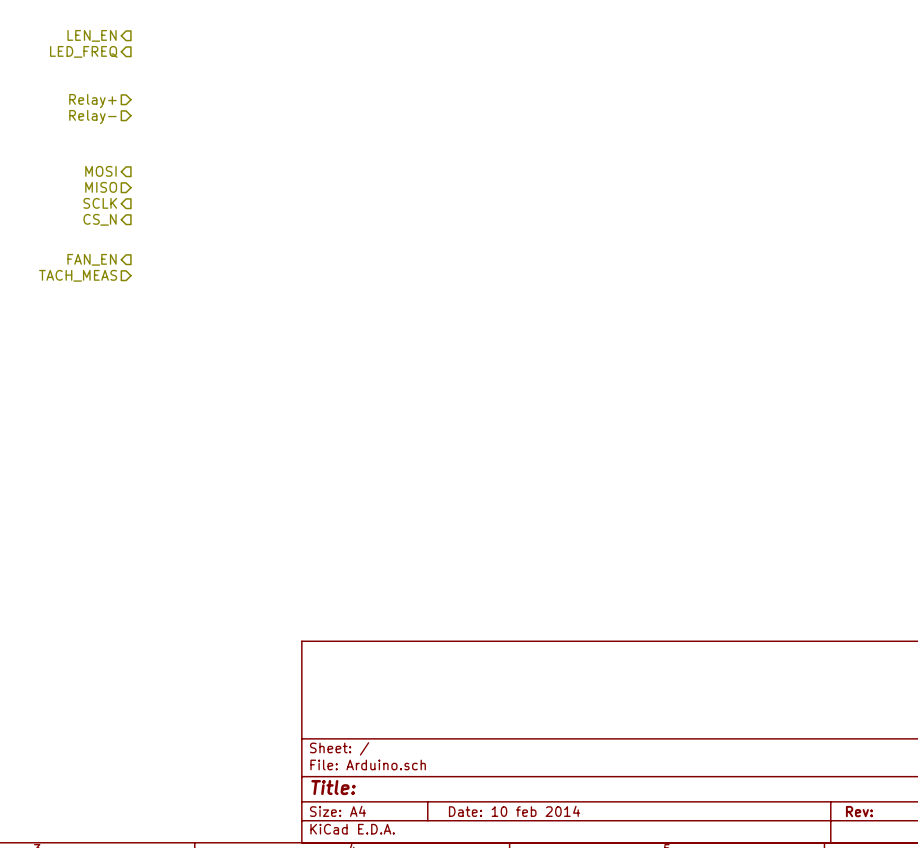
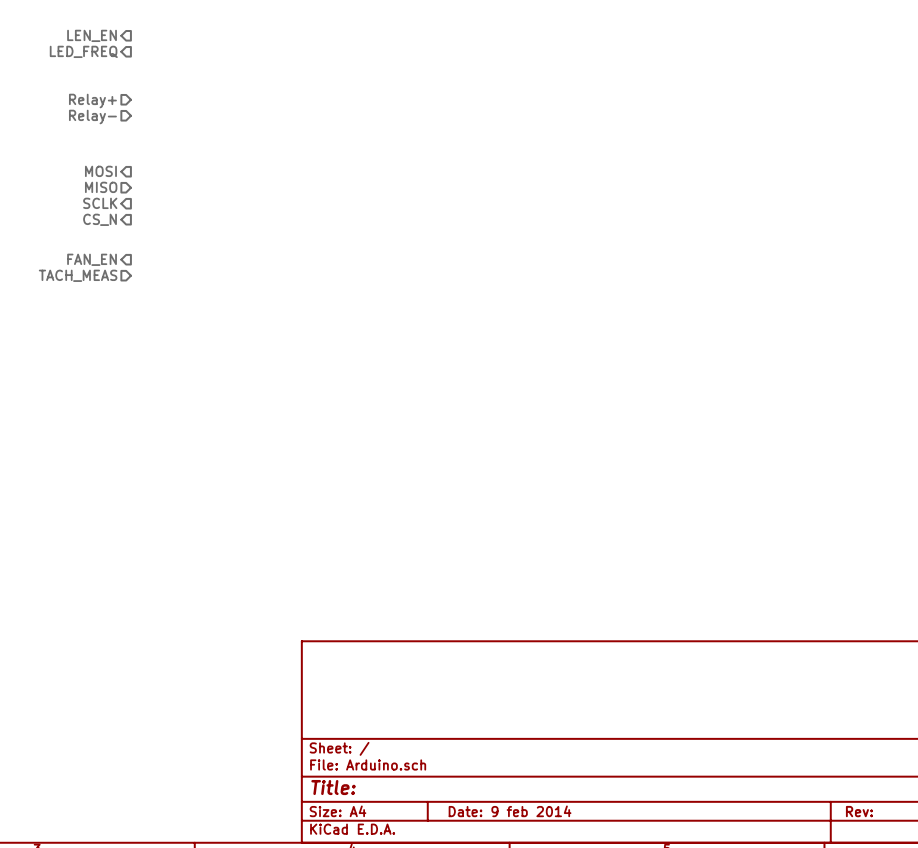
title block: Date: 10 feb 2014 (514, 811) -> Date: 9 feb 2014 (510, 811)

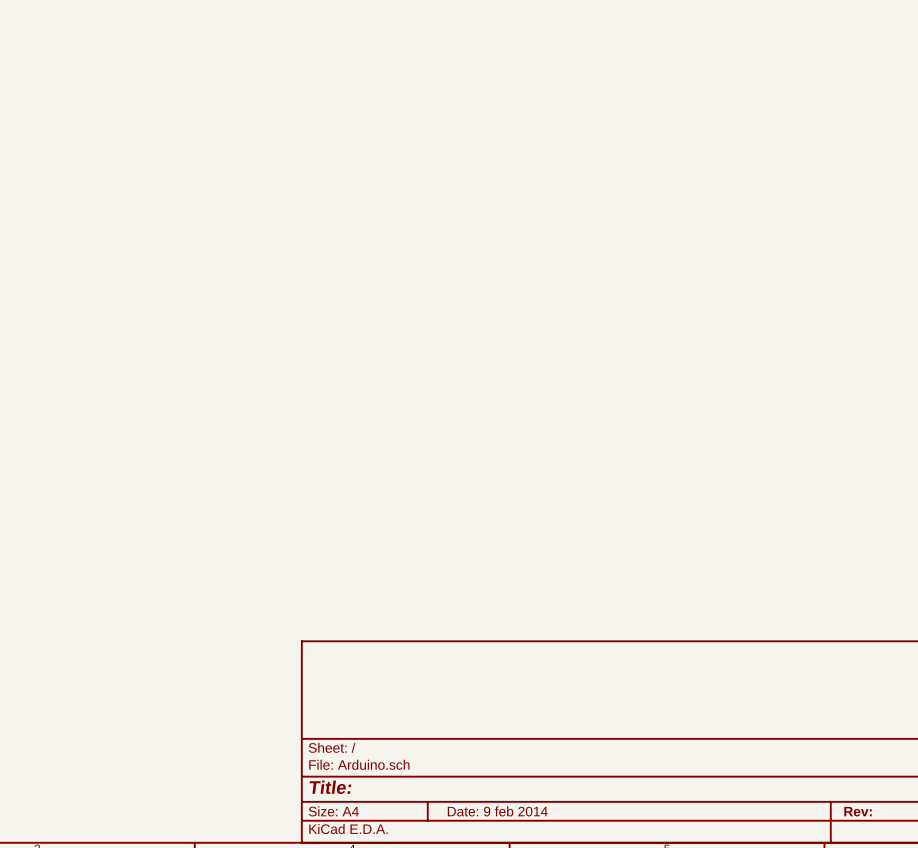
hierarchical label: LEN_EN (92, 35) -> none
hierarchical label: LED_FREQ (83, 51) -> none
hierarchical label: Relay+ (92, 101) -> none
hierarchical label: Relay- (92, 116) -> none
hierarchical label: MOSI (100, 171) -> none
hierarchical label: MISO (101, 187) -> none
hierarchical label: SCLK (100, 203) -> none
hierarchical label: CS_N (100, 219) -> none
hierarchical label: FAN_EN (92, 259) -> none
hierarchical label: TACH_MEAS (78, 275) -> none

